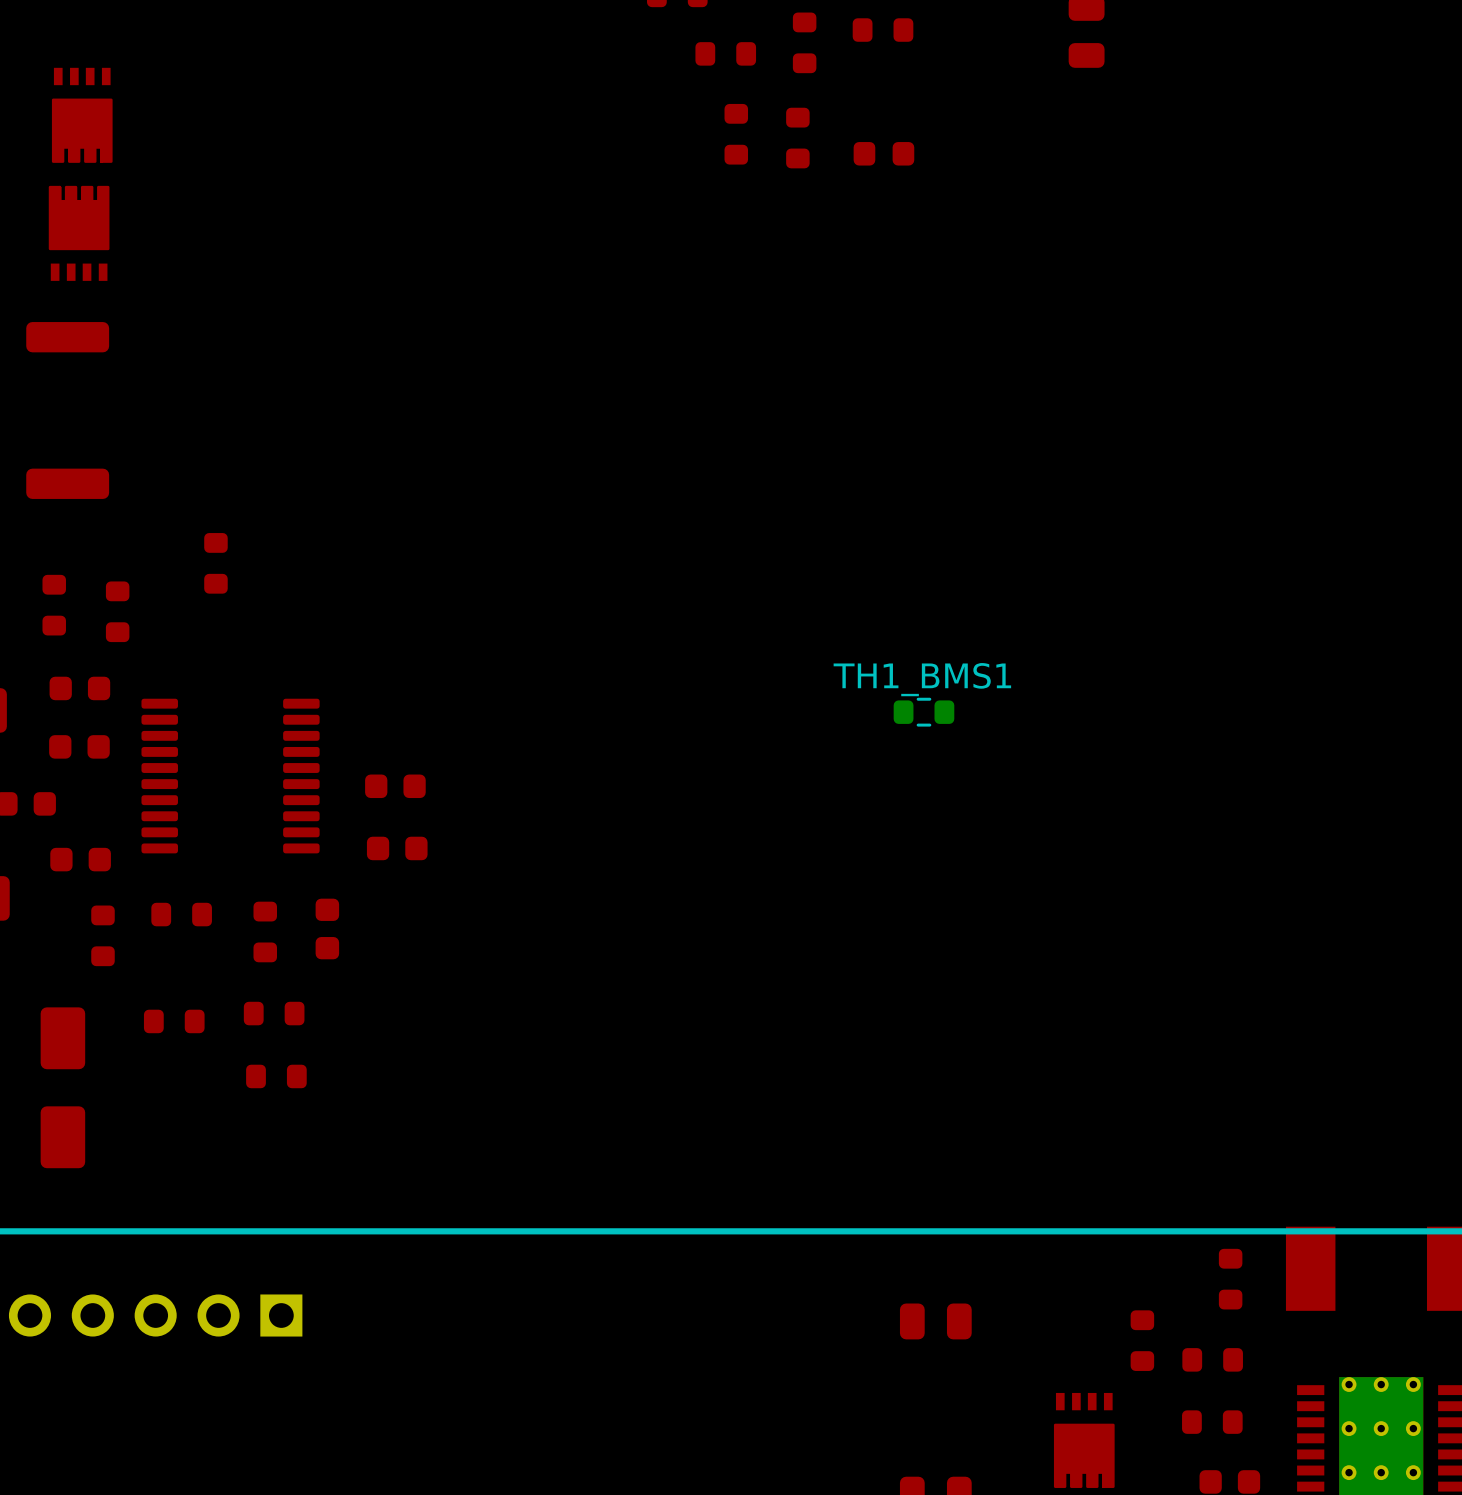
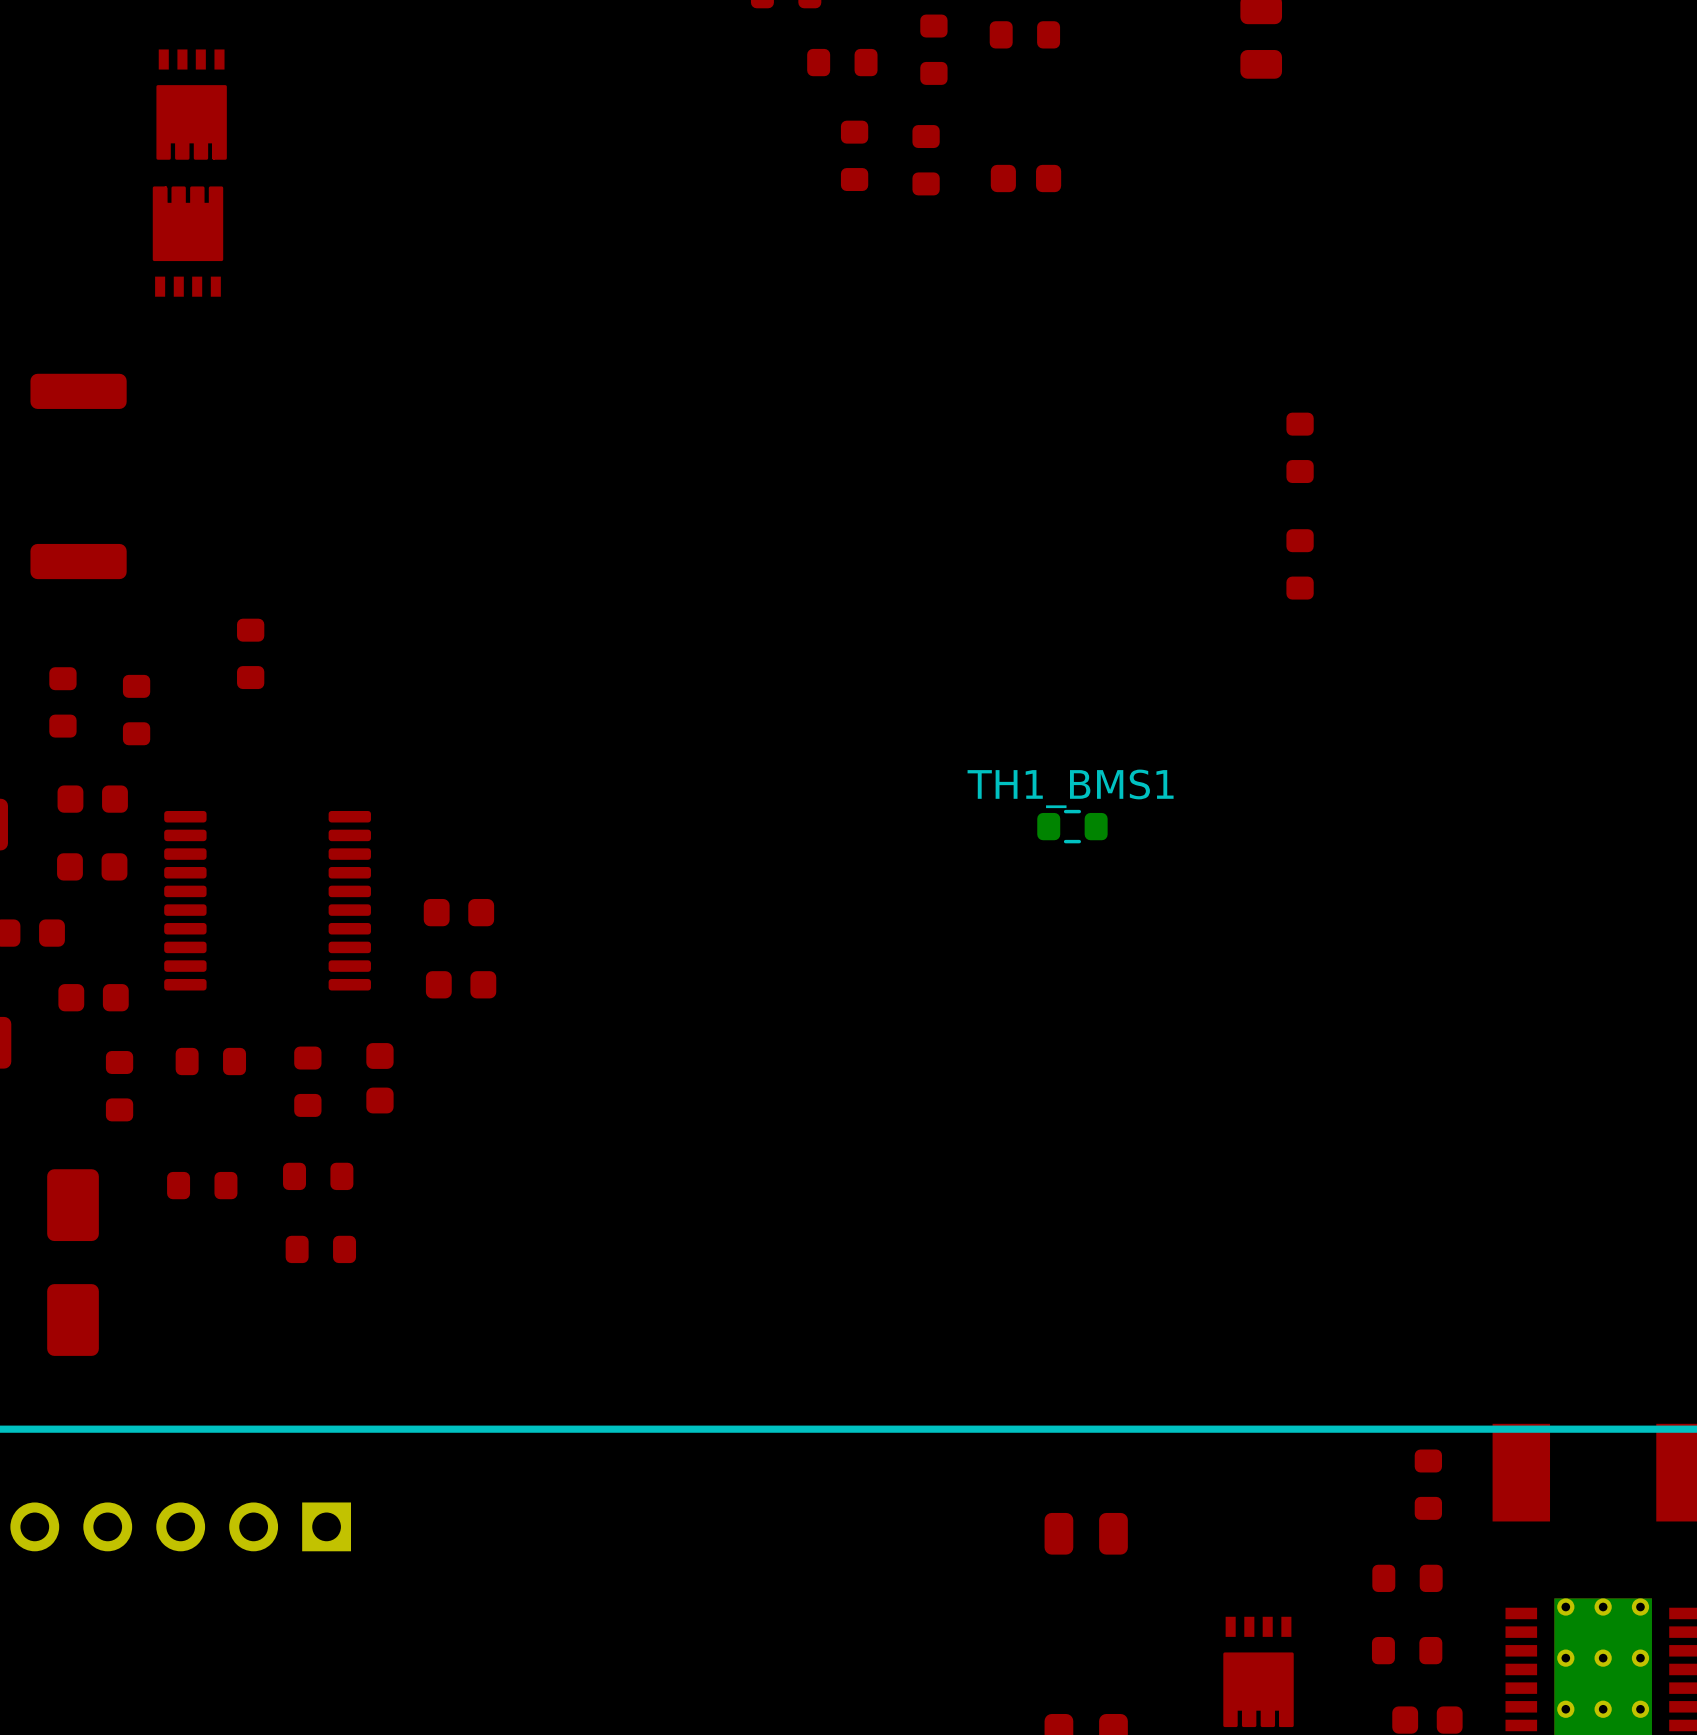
part: none -> (191, 104)
part: (82, 115) -> none
part: none -> (187, 241)
part: (79, 233) -> none
part: none -> (1300, 447)
part: none -> (1300, 564)
part: (1142, 1340) -> none

